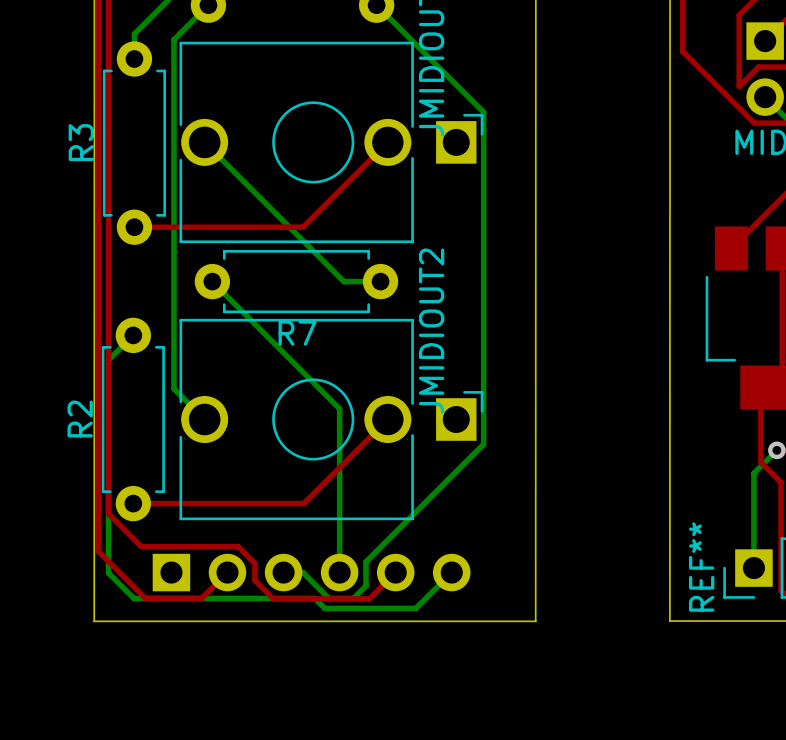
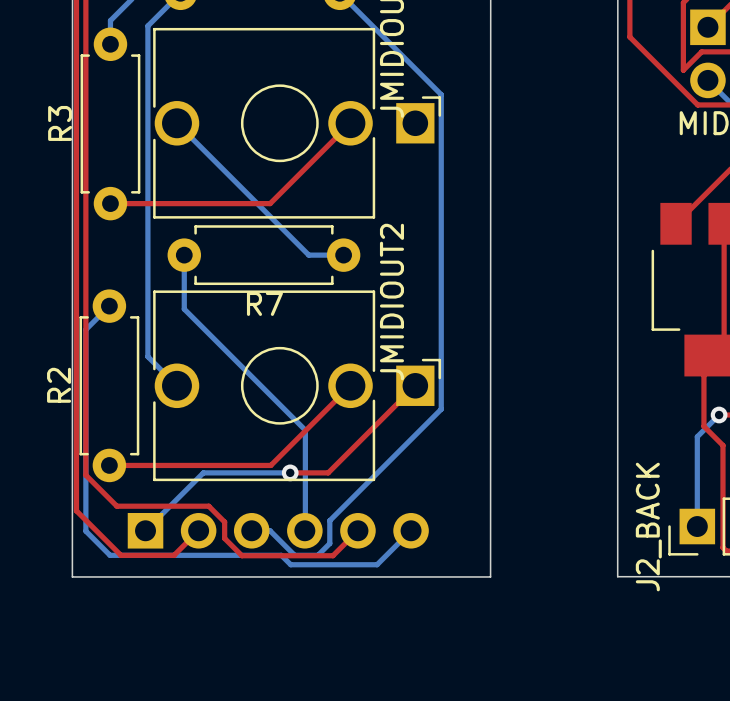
bottom track: (212, 281) (339, 408) (339, 572) -> (184, 255) (184, 309) (305, 430) (304, 530)
top track: none -> (415, 385) (328, 472) (290, 472)
bottom track: none -> (290, 472) (203, 472) (145, 530)
via: none -> (290, 472)
REF** name: REF** (701, 567) -> J2_BACK (648, 527)

